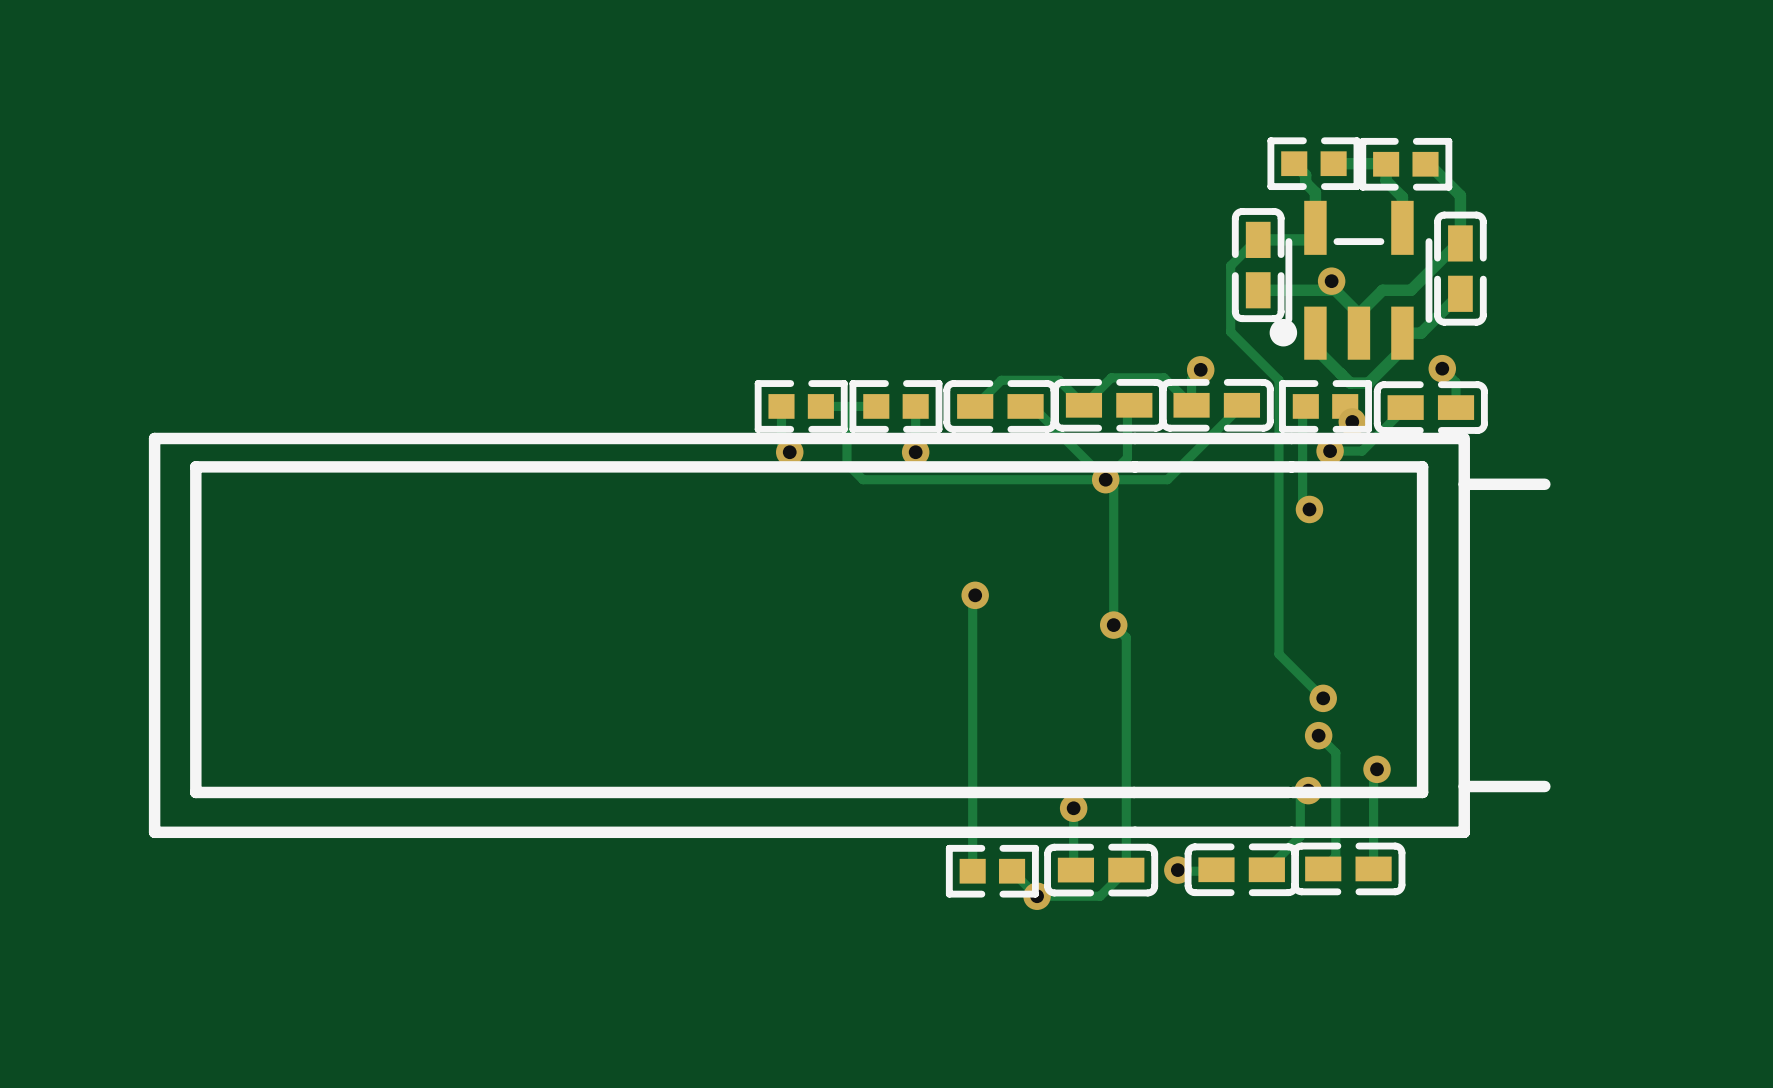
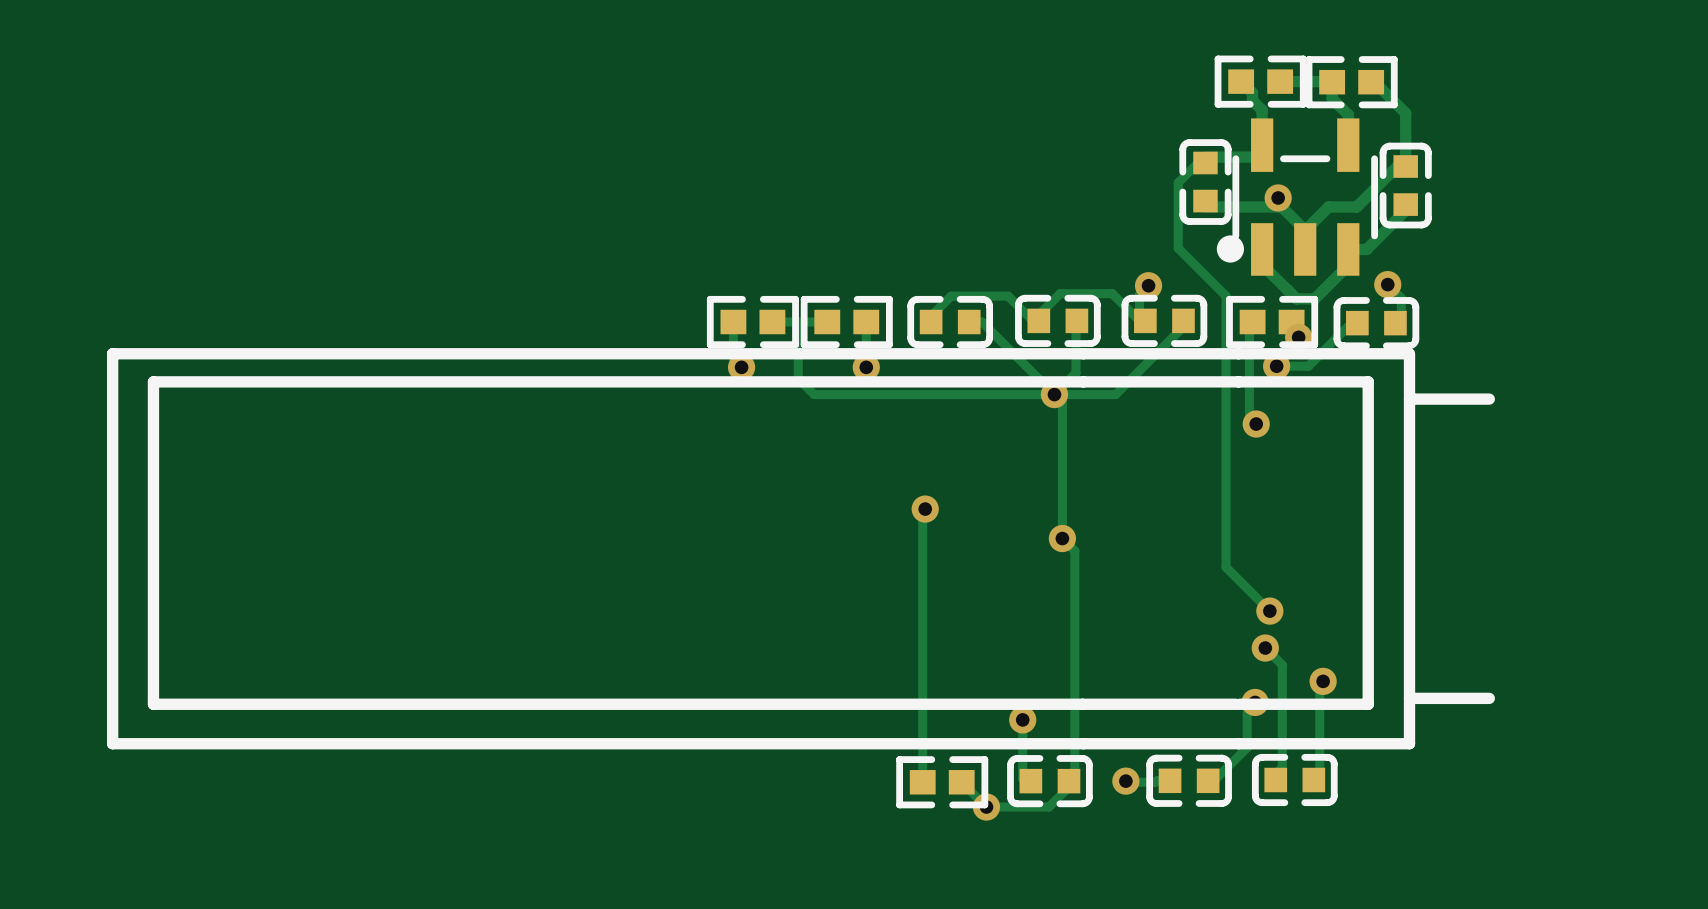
part footprint: [1231, 208, 1285, 323] -> [1179, 139, 1232, 225]
part footprint: [1434, 211, 1487, 326] -> [1379, 142, 1432, 229]
part footprint: [1052, 378, 1167, 432] -> [1015, 294, 1101, 347]
part footprint: [1159, 378, 1274, 432] -> [1121, 294, 1208, 347]
part footprint: [943, 380, 1058, 433] -> [907, 295, 994, 349]
part footprint: [1373, 381, 1488, 434] -> [1333, 297, 1420, 350]
part footprint: [1291, 842, 1406, 896] -> [1251, 753, 1338, 807]
part footprint: [1044, 843, 1159, 897] -> [1007, 755, 1093, 808]
part footprint: [1184, 843, 1299, 897] -> [1146, 754, 1232, 807]

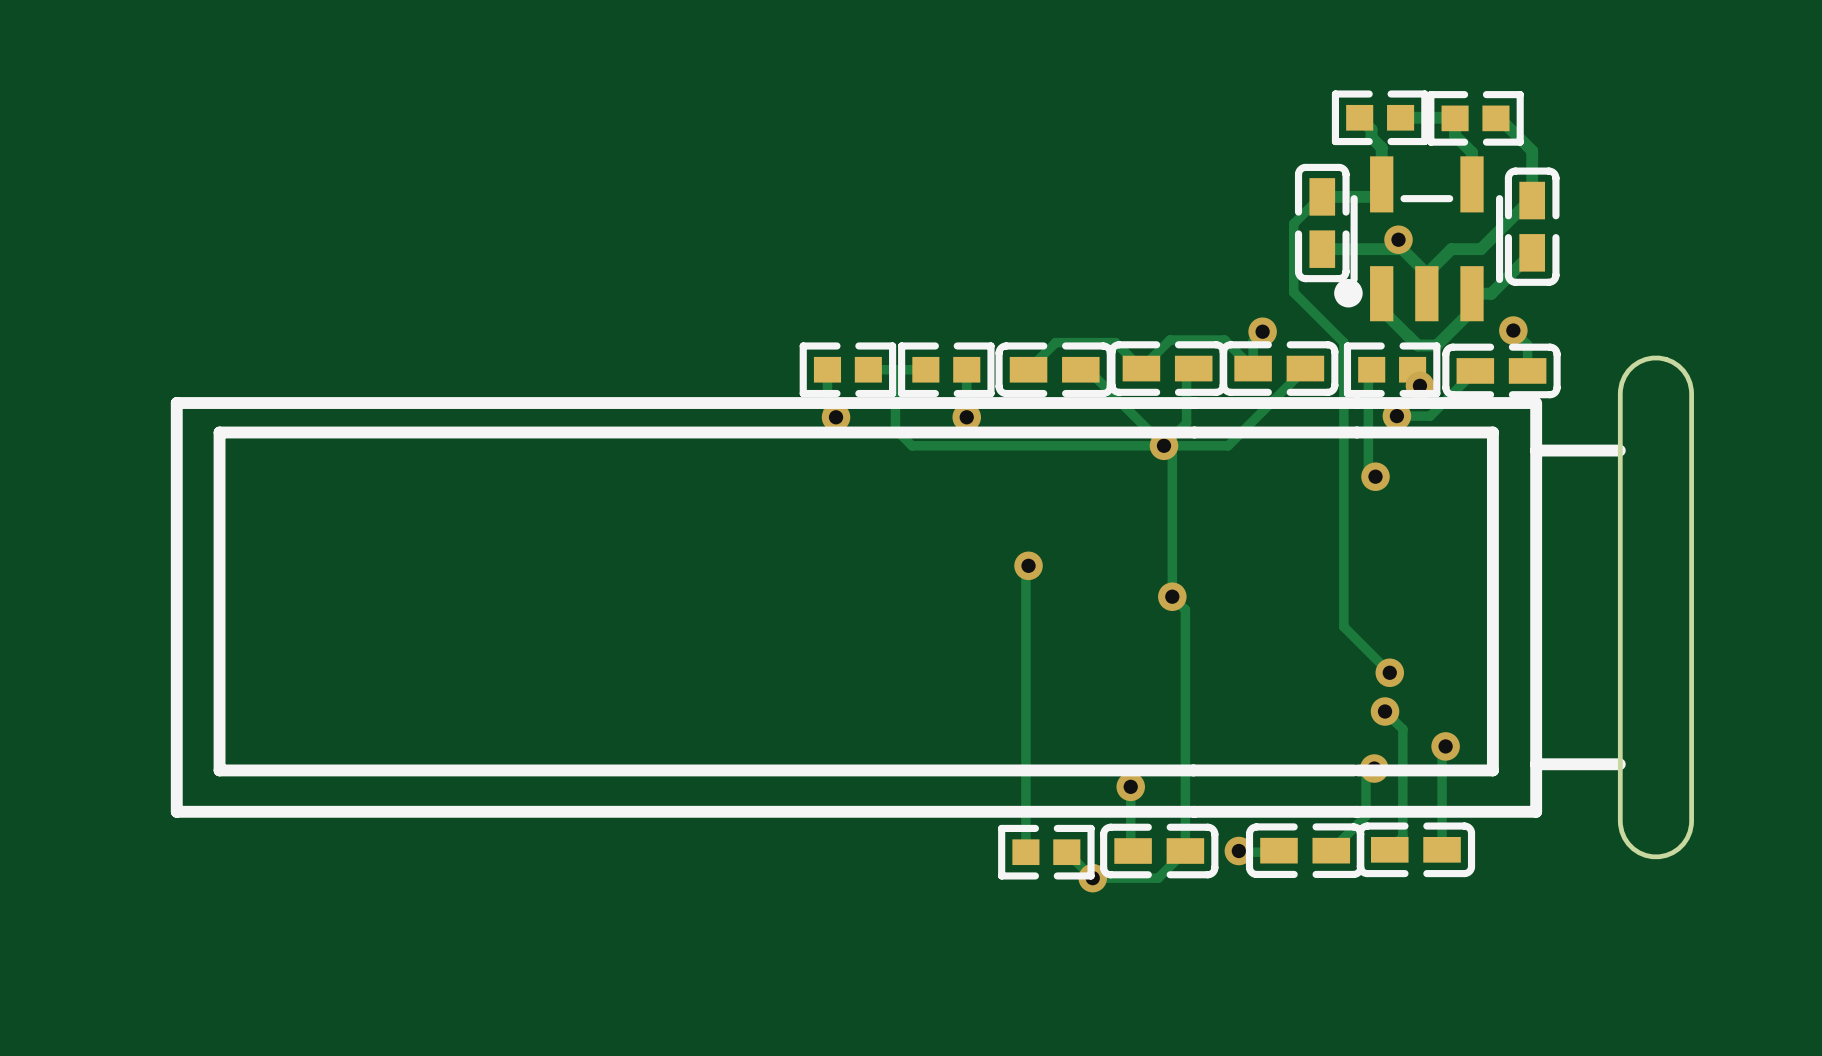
part footprint: [1179, 139, 1232, 225] -> [1294, 163, 1350, 283]
part footprint: [1379, 142, 1432, 229] -> [1504, 167, 1560, 286]
part footprint: [1015, 294, 1101, 347] -> [1108, 341, 1227, 396]
part footprint: [1121, 294, 1208, 347] -> [1220, 341, 1339, 396]
part footprint: [907, 295, 994, 349] -> [995, 342, 1114, 398]
part footprint: [1333, 297, 1420, 350] -> [1442, 343, 1561, 399]
part footprint: [106, 348, 1495, 750] -> [170, 355, 1694, 860]
part footprint: [1251, 753, 1338, 807] -> [1356, 822, 1476, 878]
part footprint: [1146, 754, 1232, 807] -> [1245, 823, 1365, 879]
part footprint: [1007, 755, 1093, 808] -> [1100, 823, 1219, 879]

